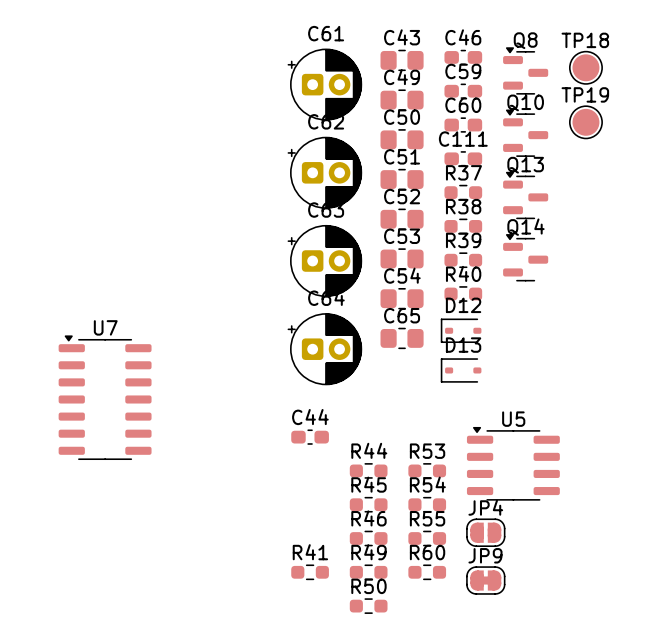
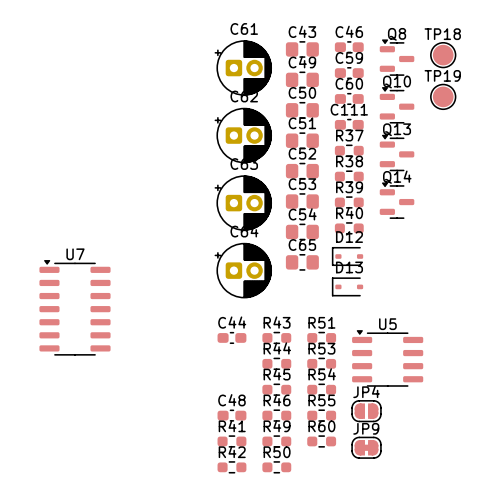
R43: none -> (276, 337)
R51: none -> (321, 337)
C48: none -> (231, 415)
R42: none -> (231, 467)

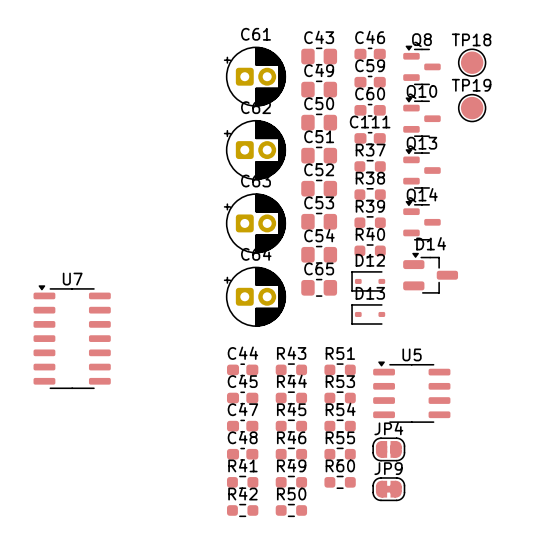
D14: none -> (430, 273)
C45: none -> (242, 398)
C47: none -> (242, 426)

